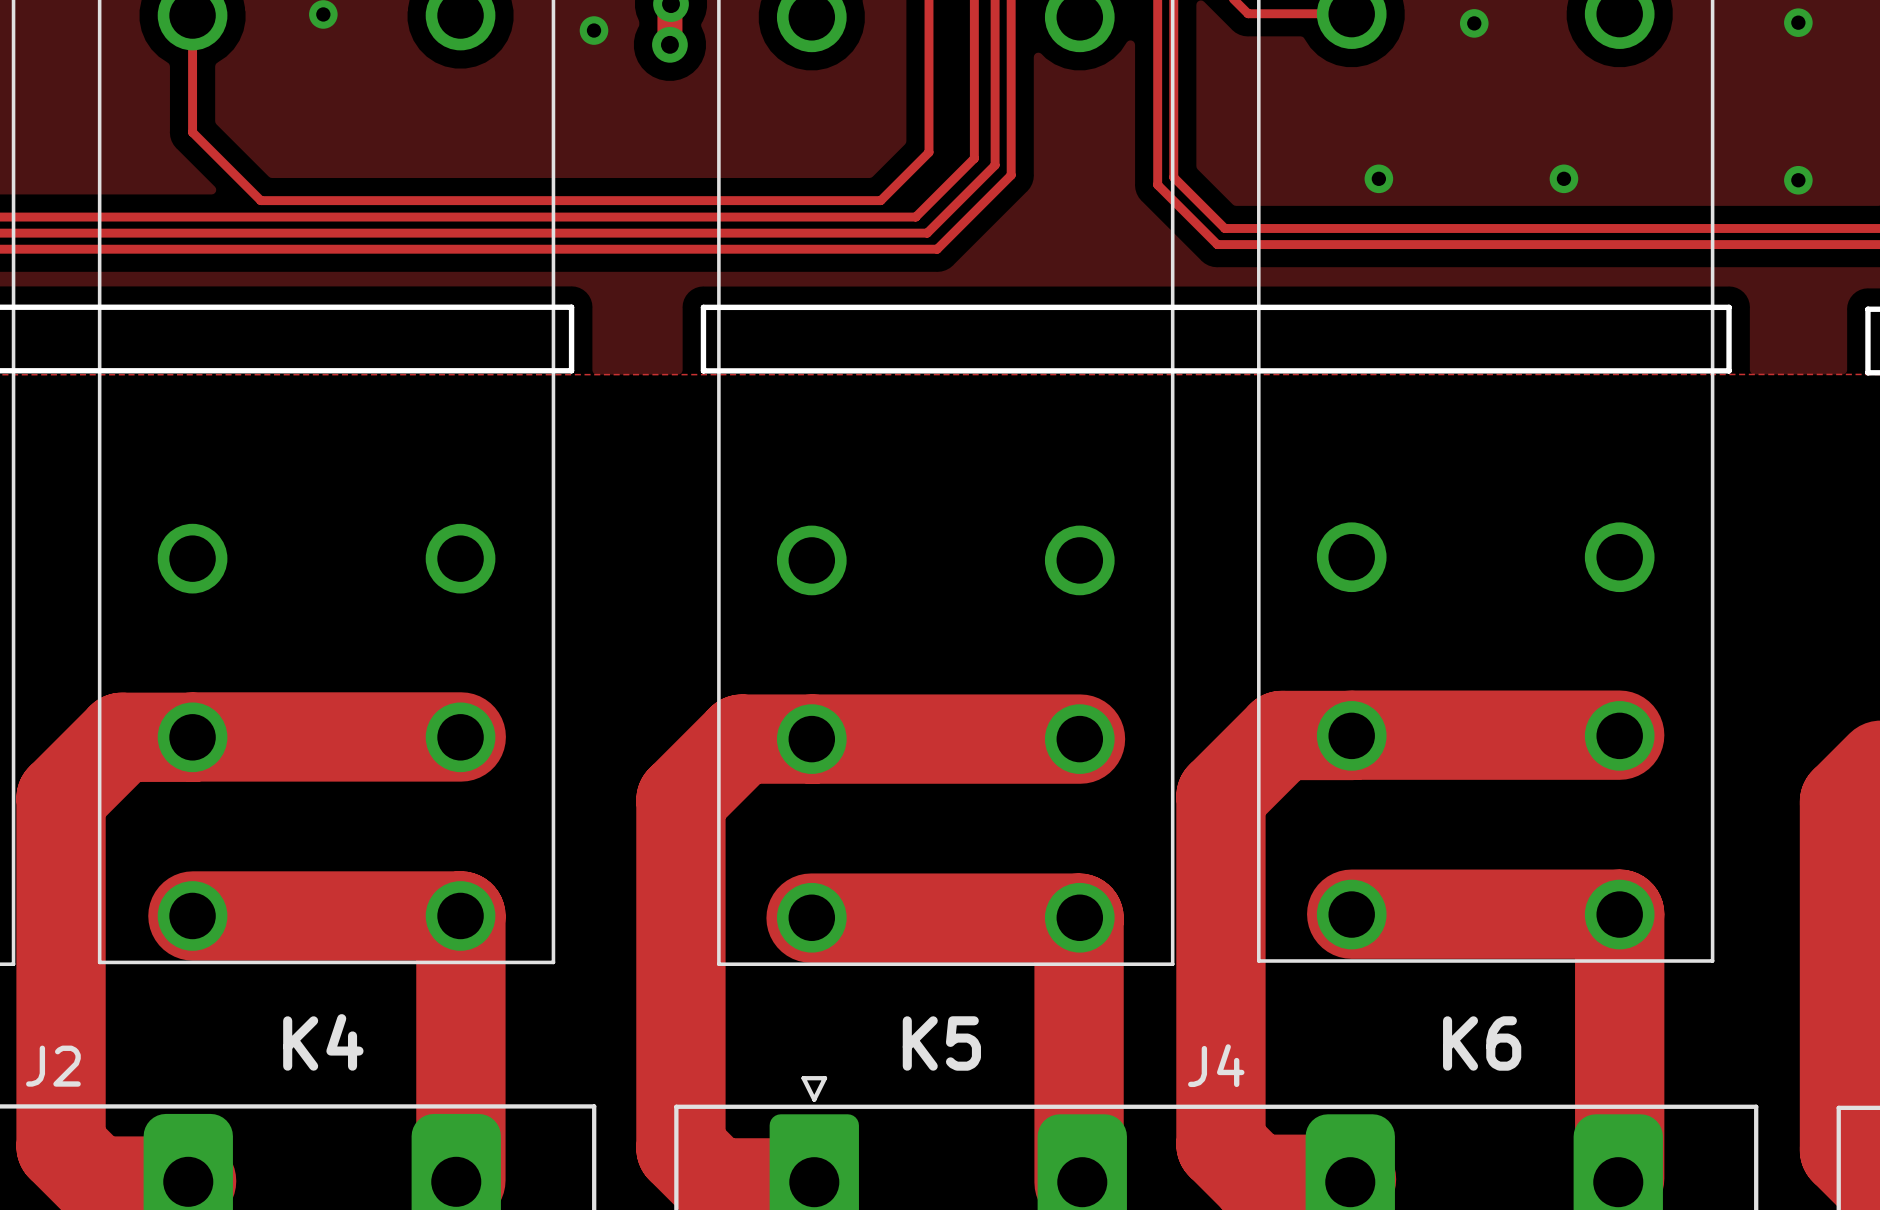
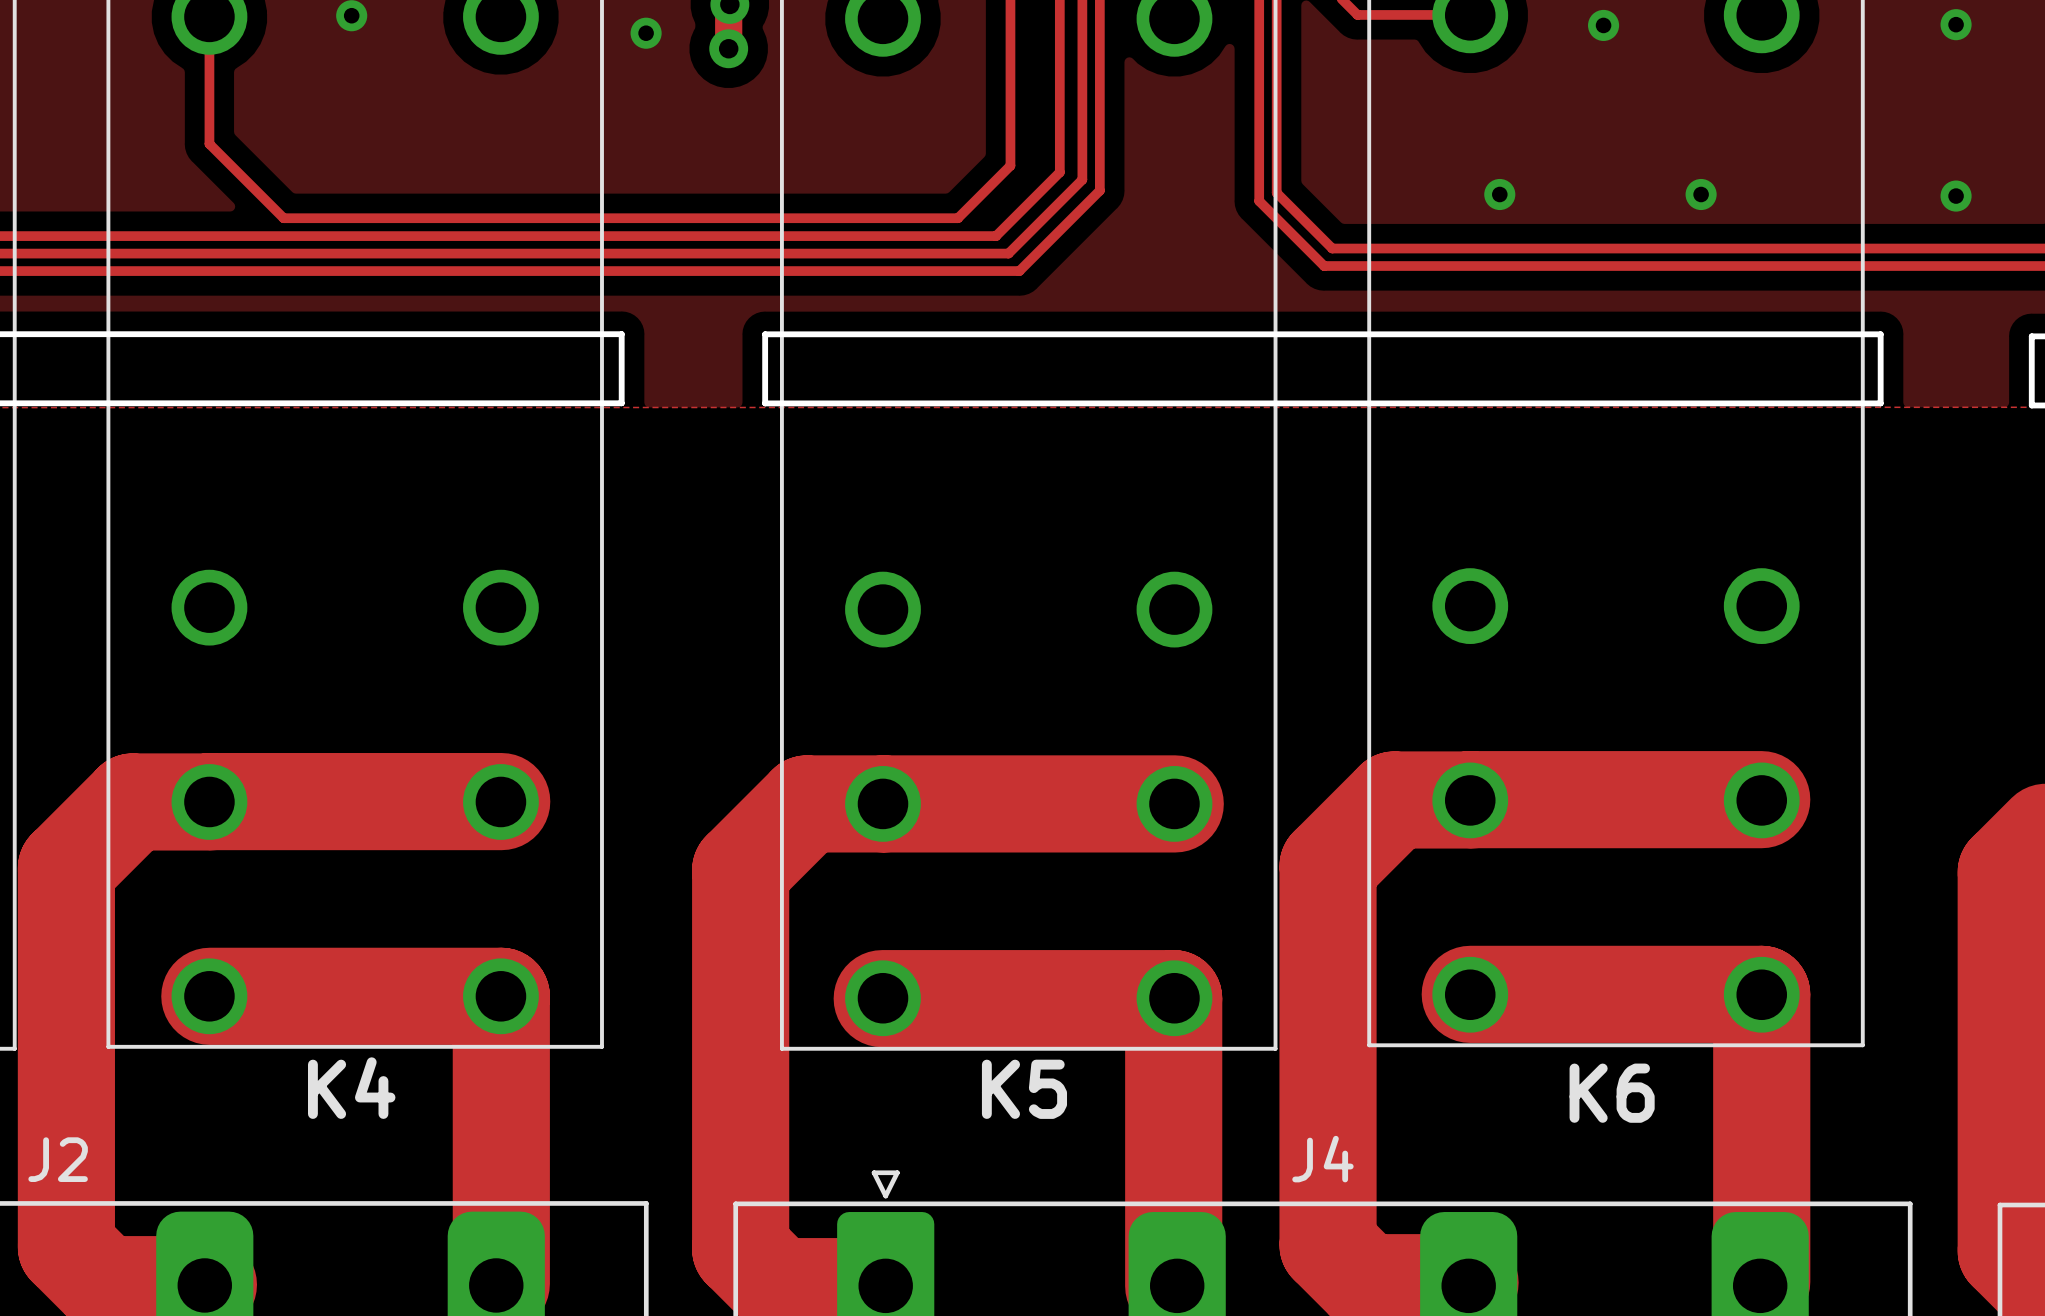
K4 name position: K4 (323, 1042) -> K4 (351, 1088)
K5 name position: K5 (941, 1043) -> K5 (1024, 1089)
K6 name position: K6 (1482, 1043) -> K6 (1612, 1093)

